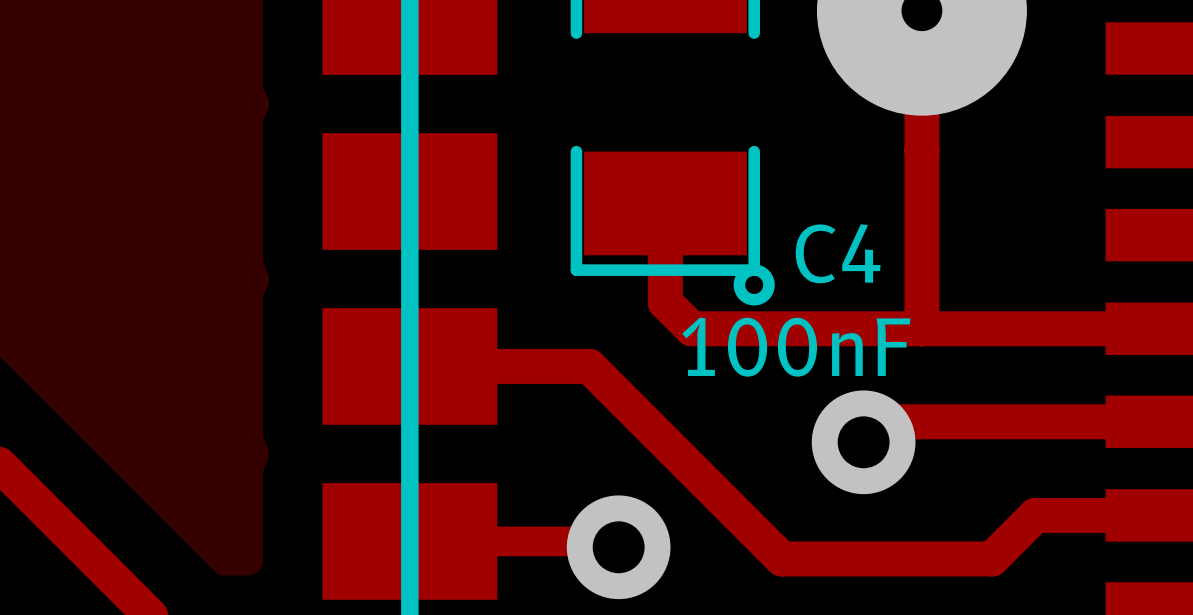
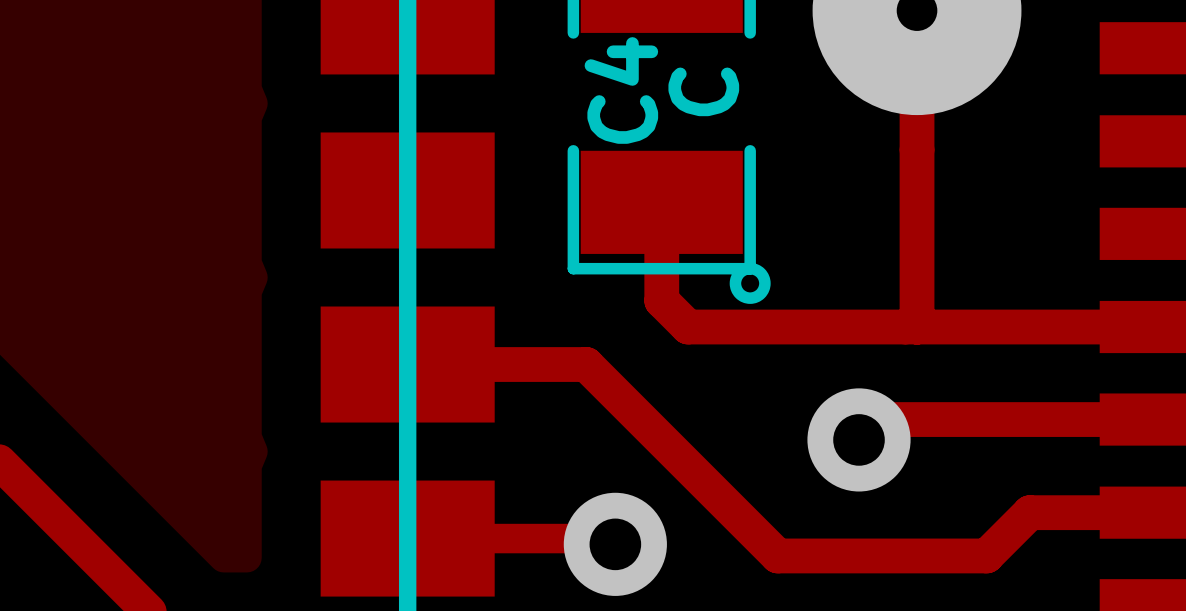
C4 name rotation: 0° (838, 253) -> 90° counterclockwise (621, 90)
C4 name position: C4 (838, 253) -> C4 (621, 90)
C4 value: 100nF (796, 347) -> C (703, 91)

